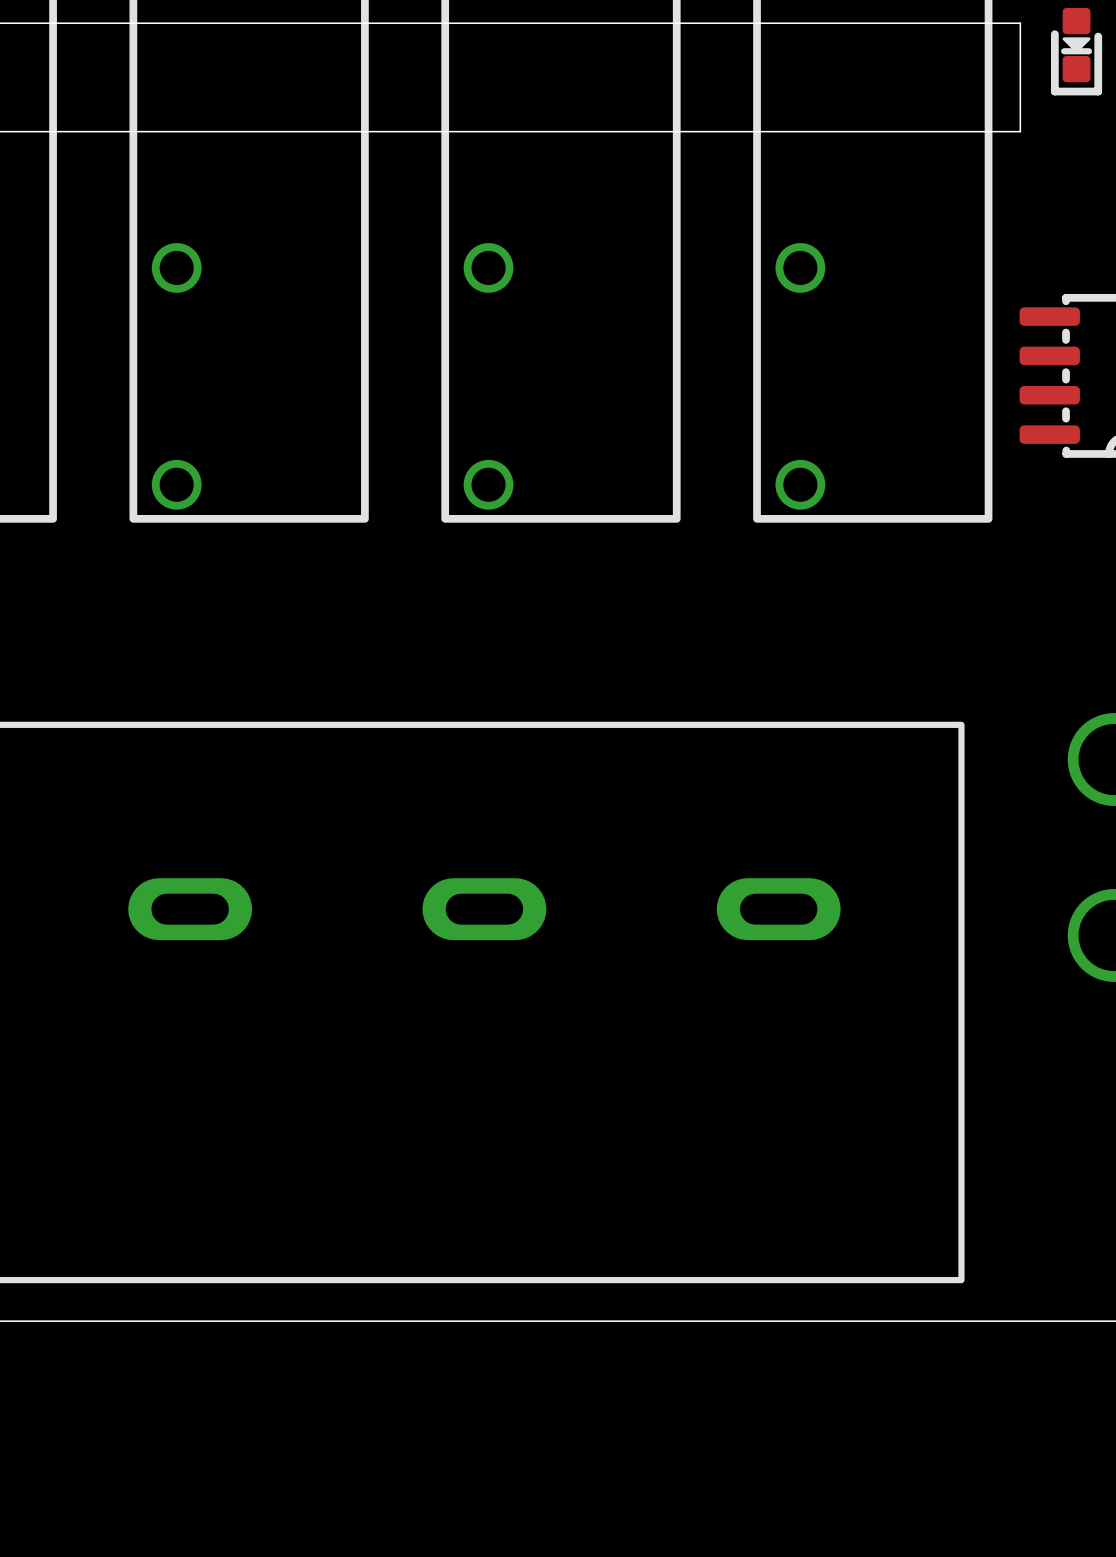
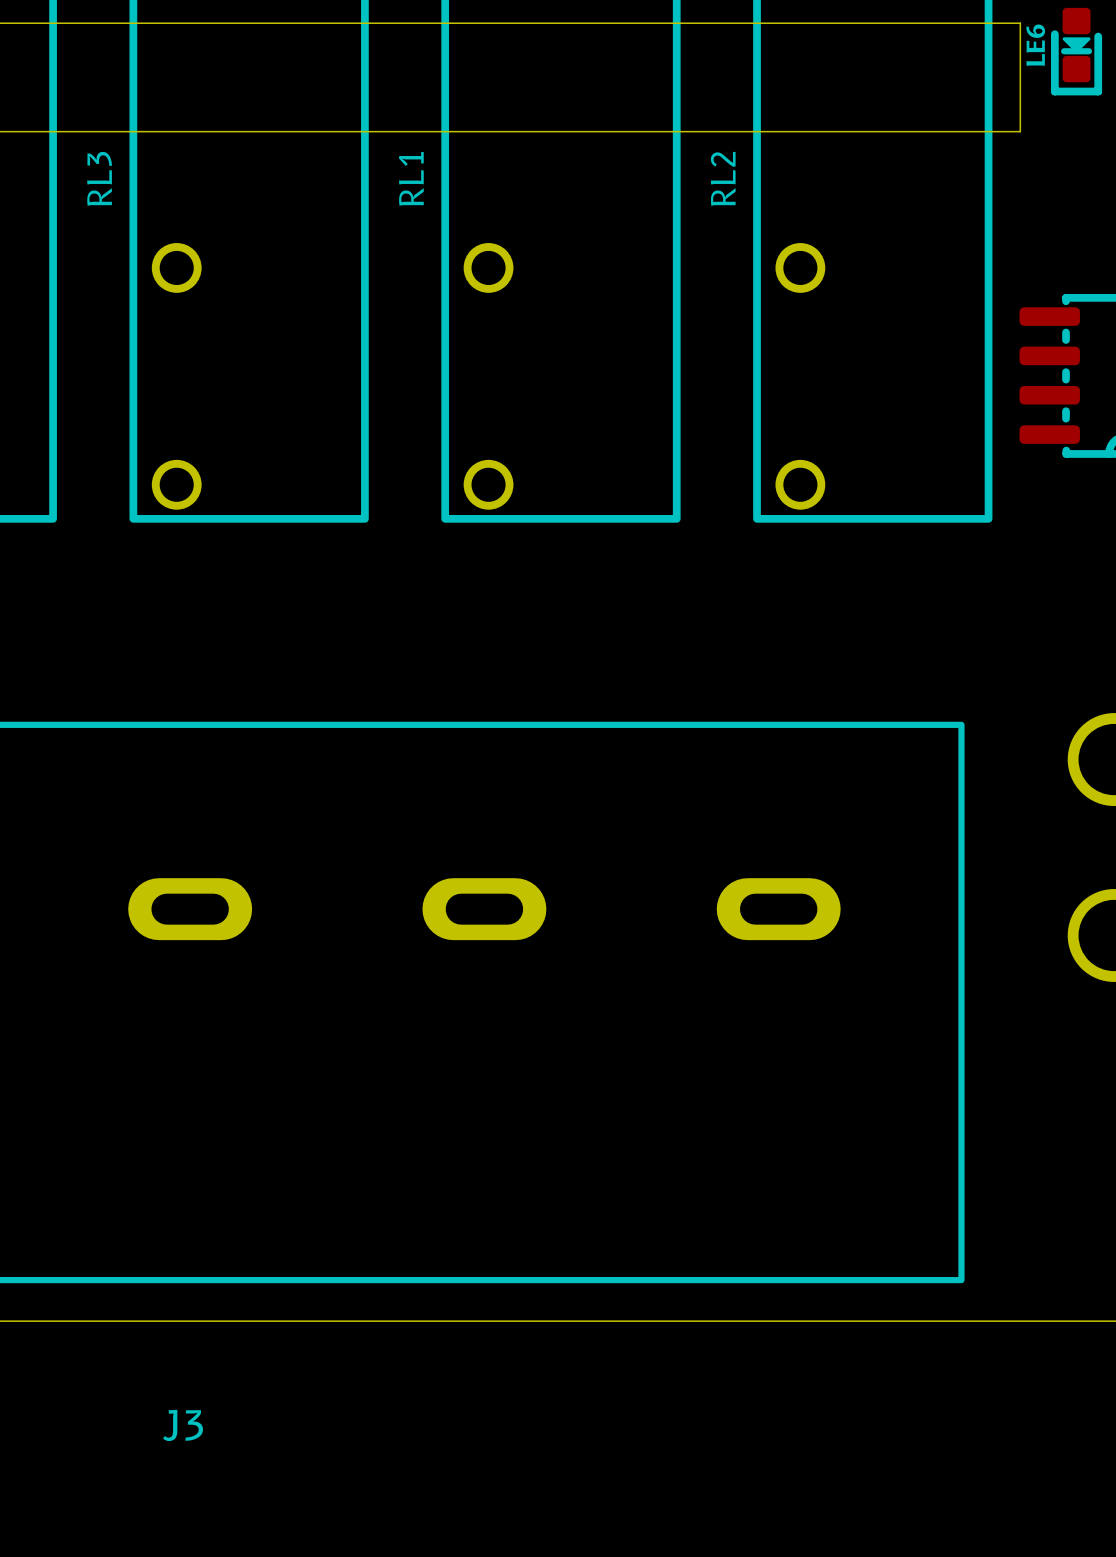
LE6 name: none -> LE6 (1035, 45)
RL3 name: none -> RL3 (99, 178)
RL1 name: none -> RL1 (411, 178)
RL2 name: none -> RL2 (723, 178)
J3 name: none -> J3 (183, 1425)

